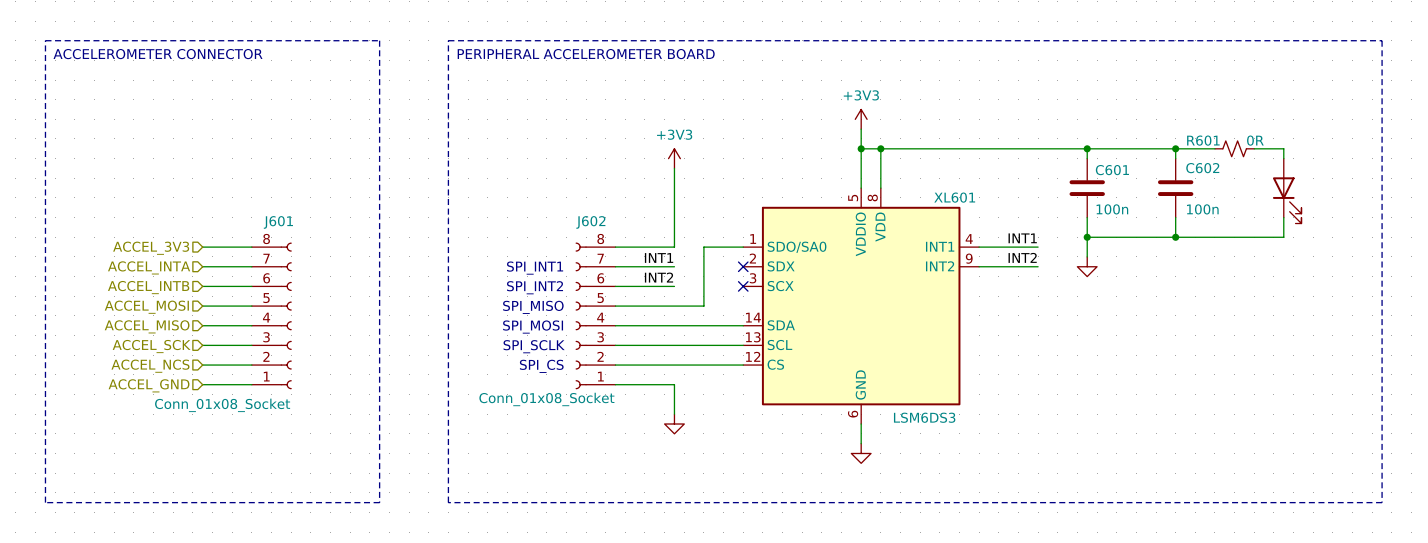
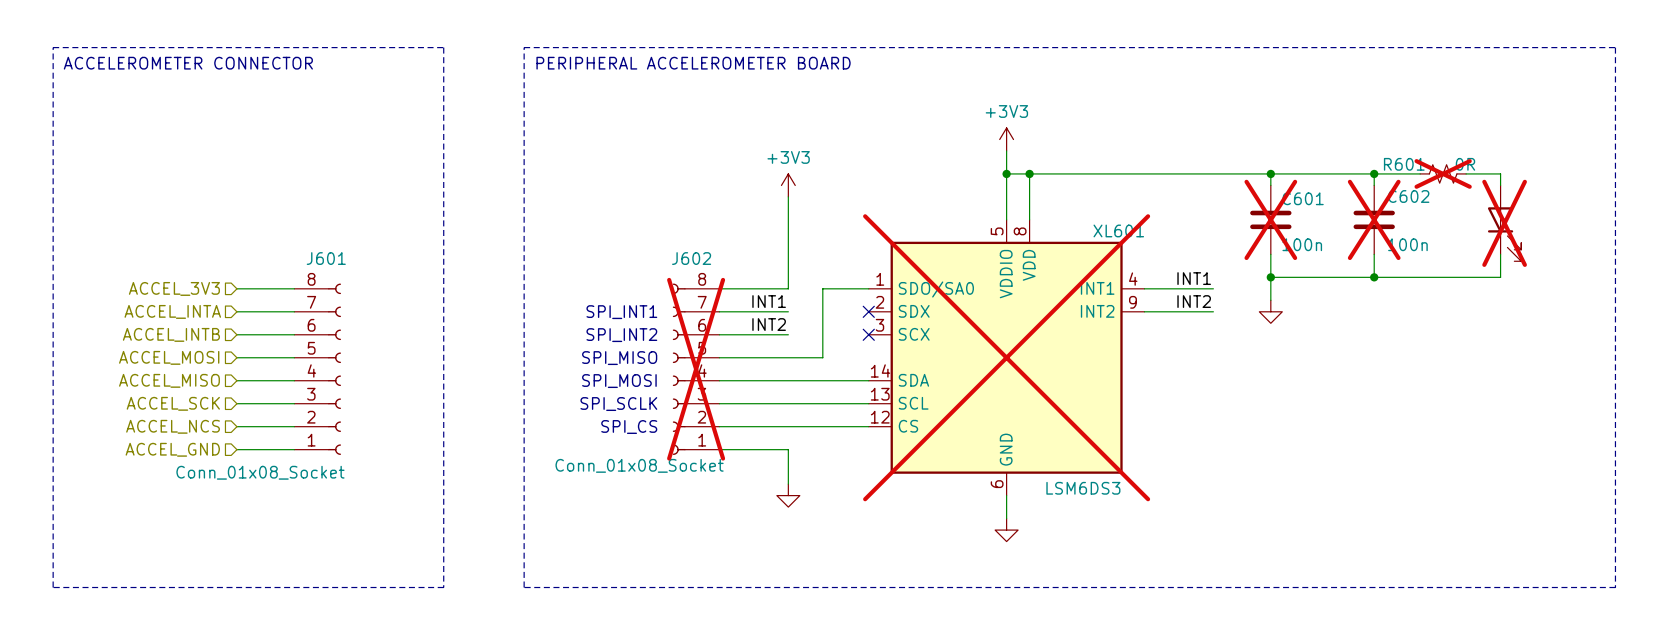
R601 do-not-place cross: none -> (1443, 173)
C601 do-not-place cross: none -> (1270, 219)
C602 do-not-place cross: none -> (1374, 219)
part do-not-place cross: none -> (1504, 223)
XL601 do-not-place cross: none -> (1006, 357)
J602 do-not-place cross: none -> (696, 369)

